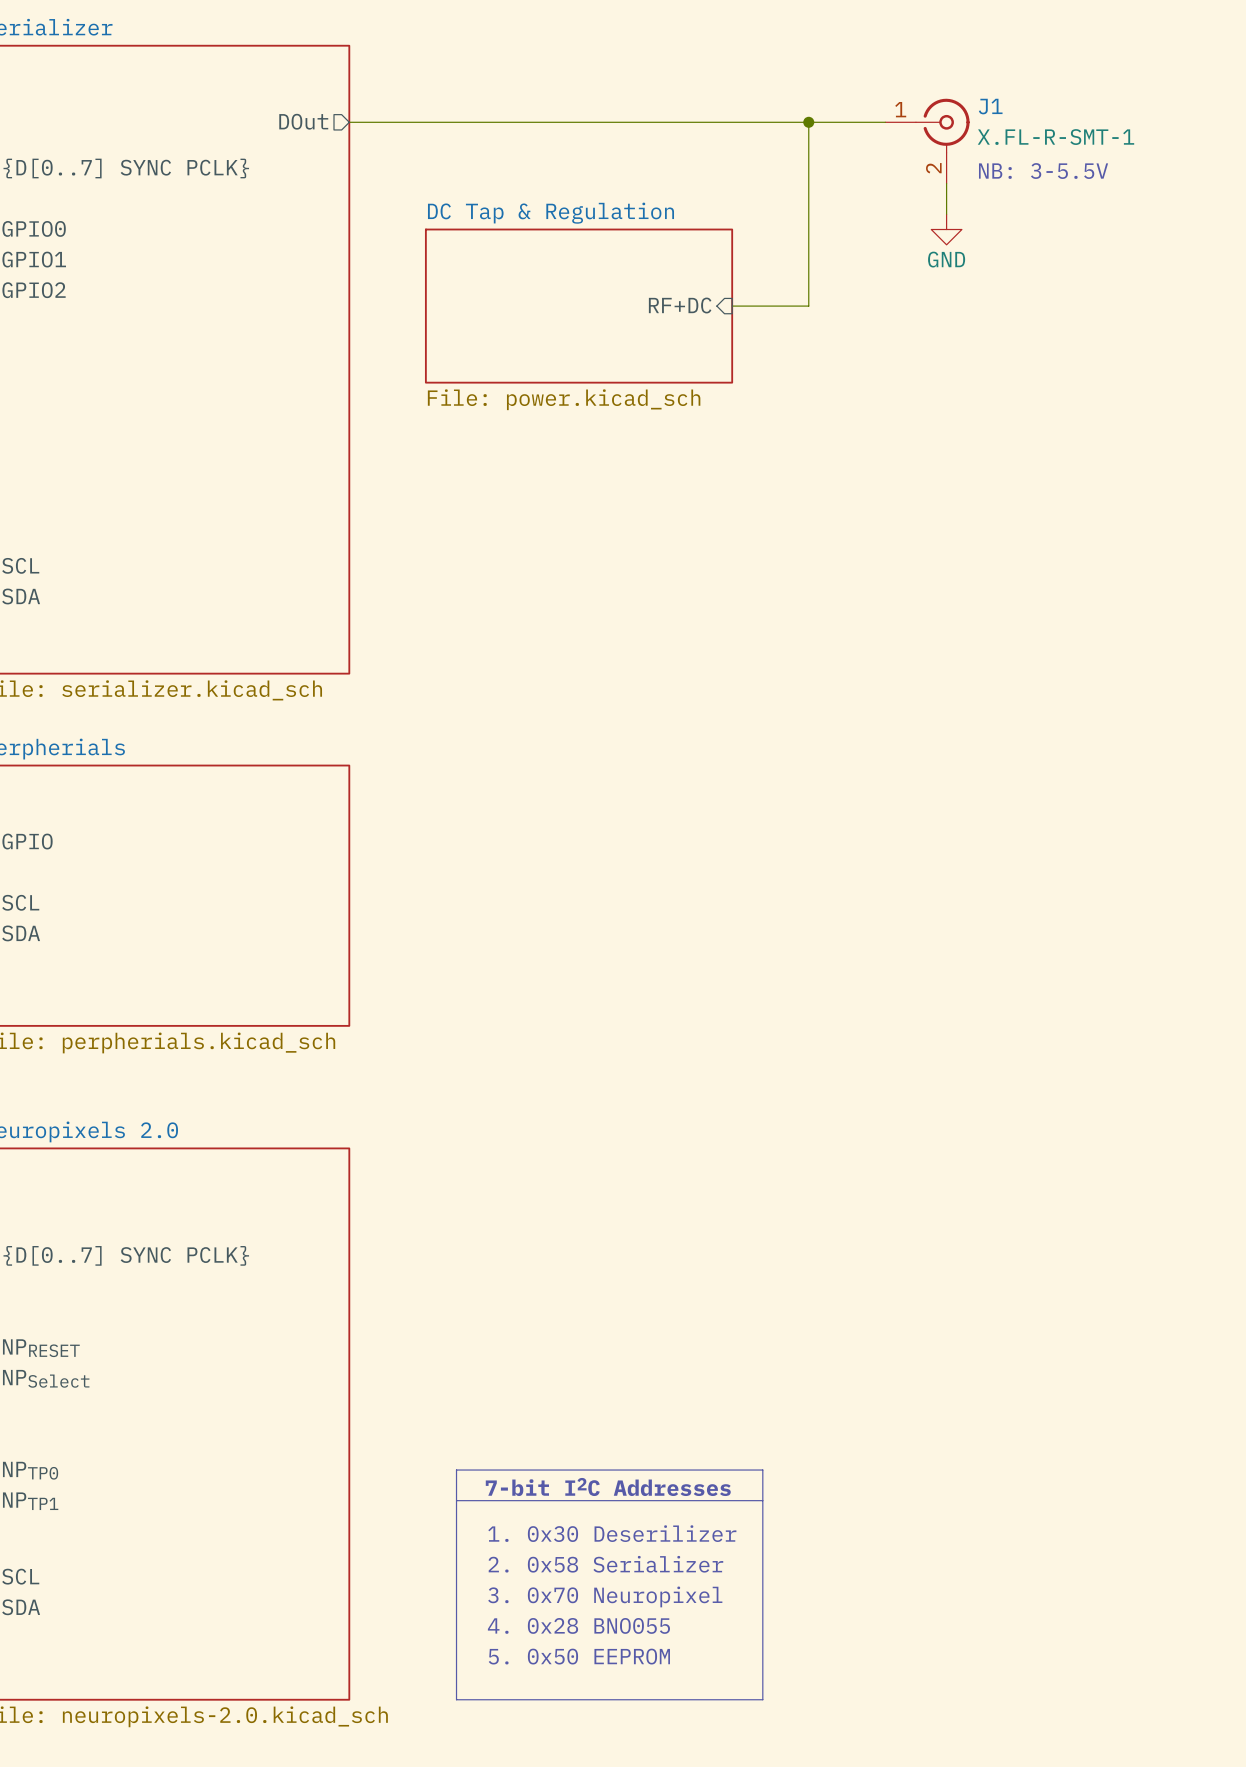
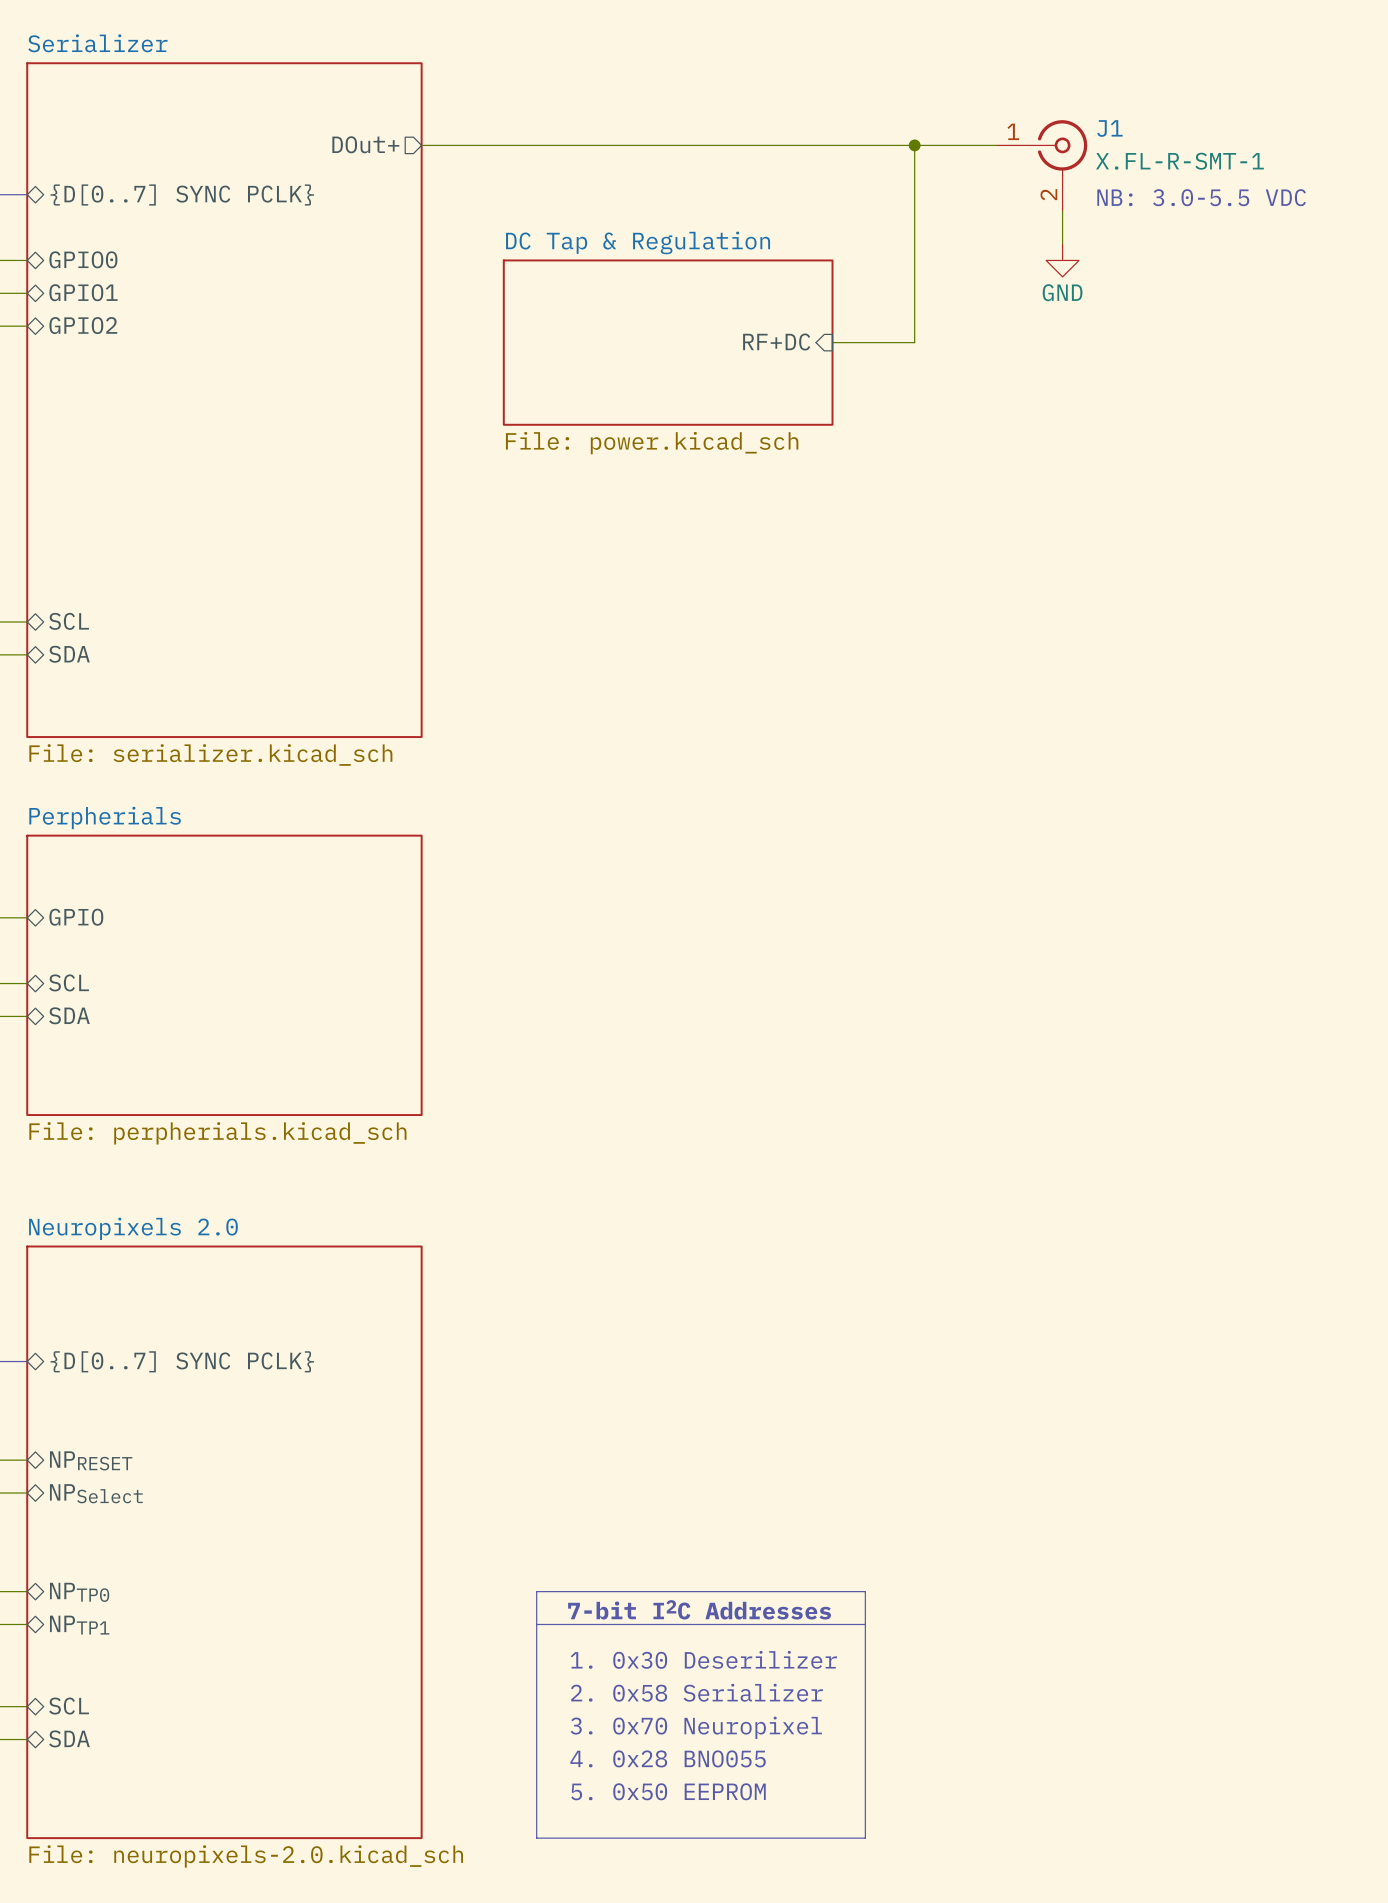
sheet pin: DOut (303, 121) -> DOut+ (365, 144)
text: NB: 3-5.5V (1043, 171) -> NB: 3.0-5.5 VDC (1201, 197)

